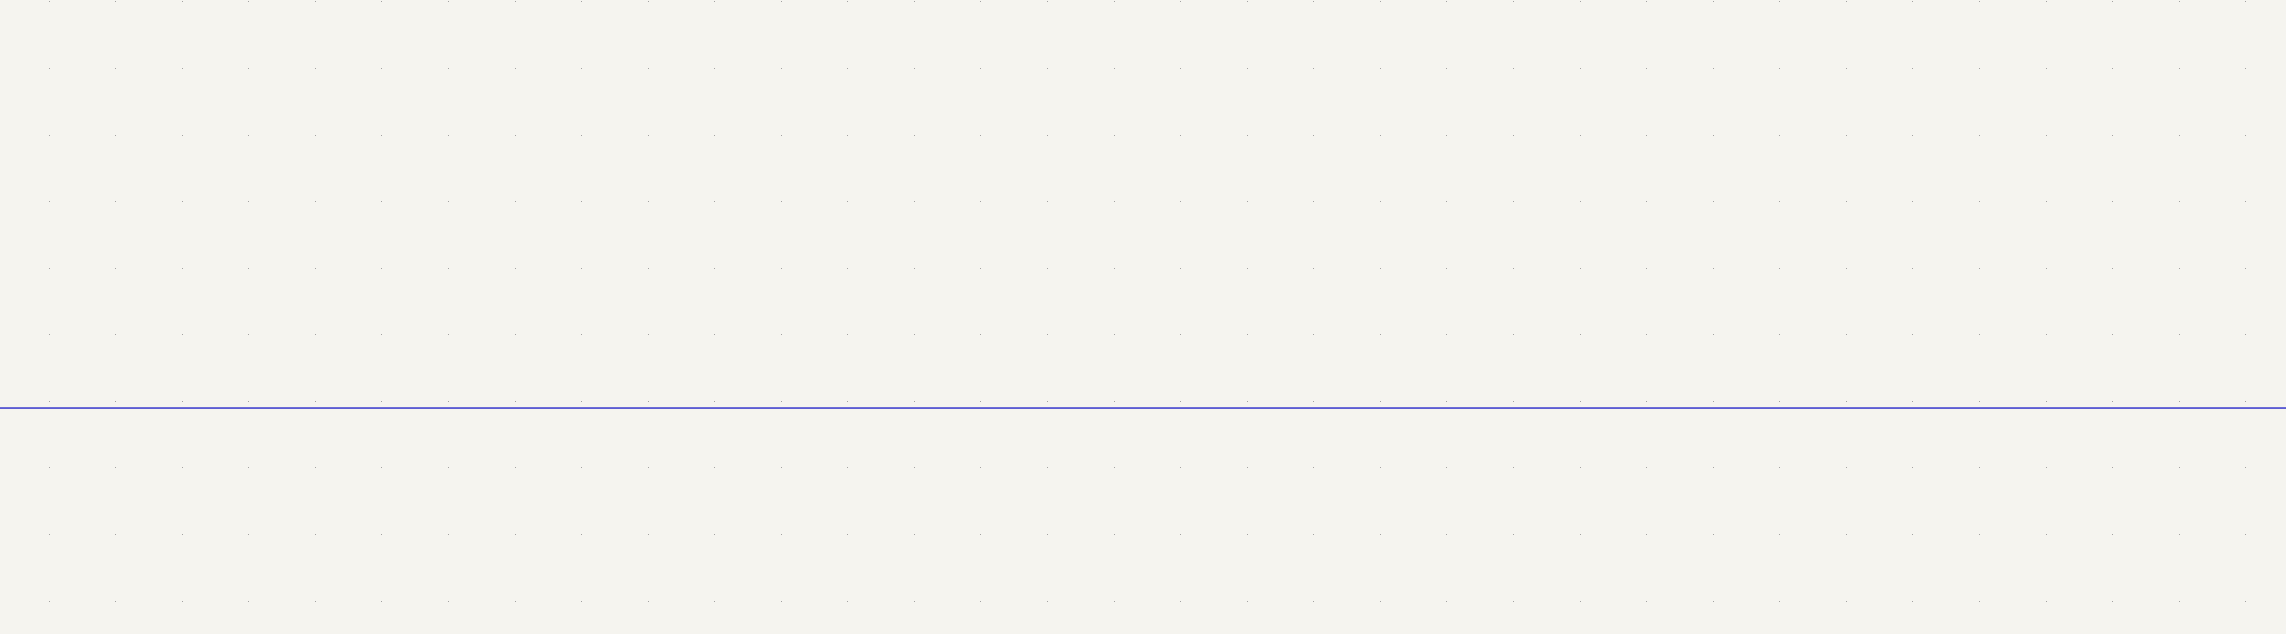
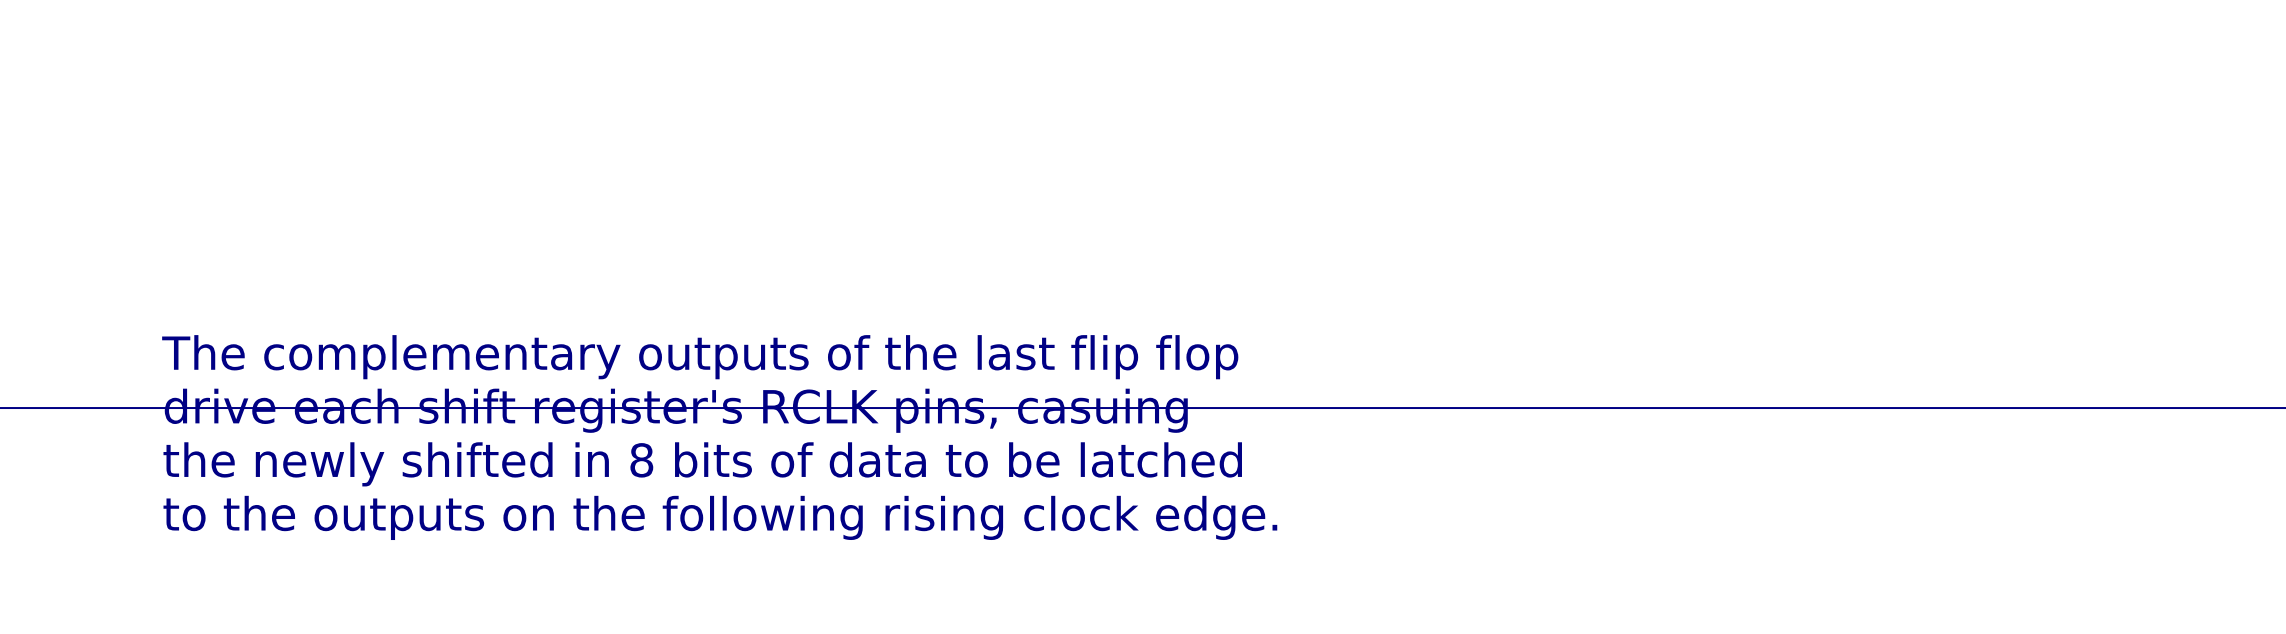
text: none -> The complementary outputs of the last flip flop (700, 357)
text: none -> drive each shift register's RCLK pins, casuing (676, 410)
text: none -> the newly shifted in 8 bits of data to be latched (702, 464)
text: none -> to the outputs on the following rising clock edge. (720, 517)

